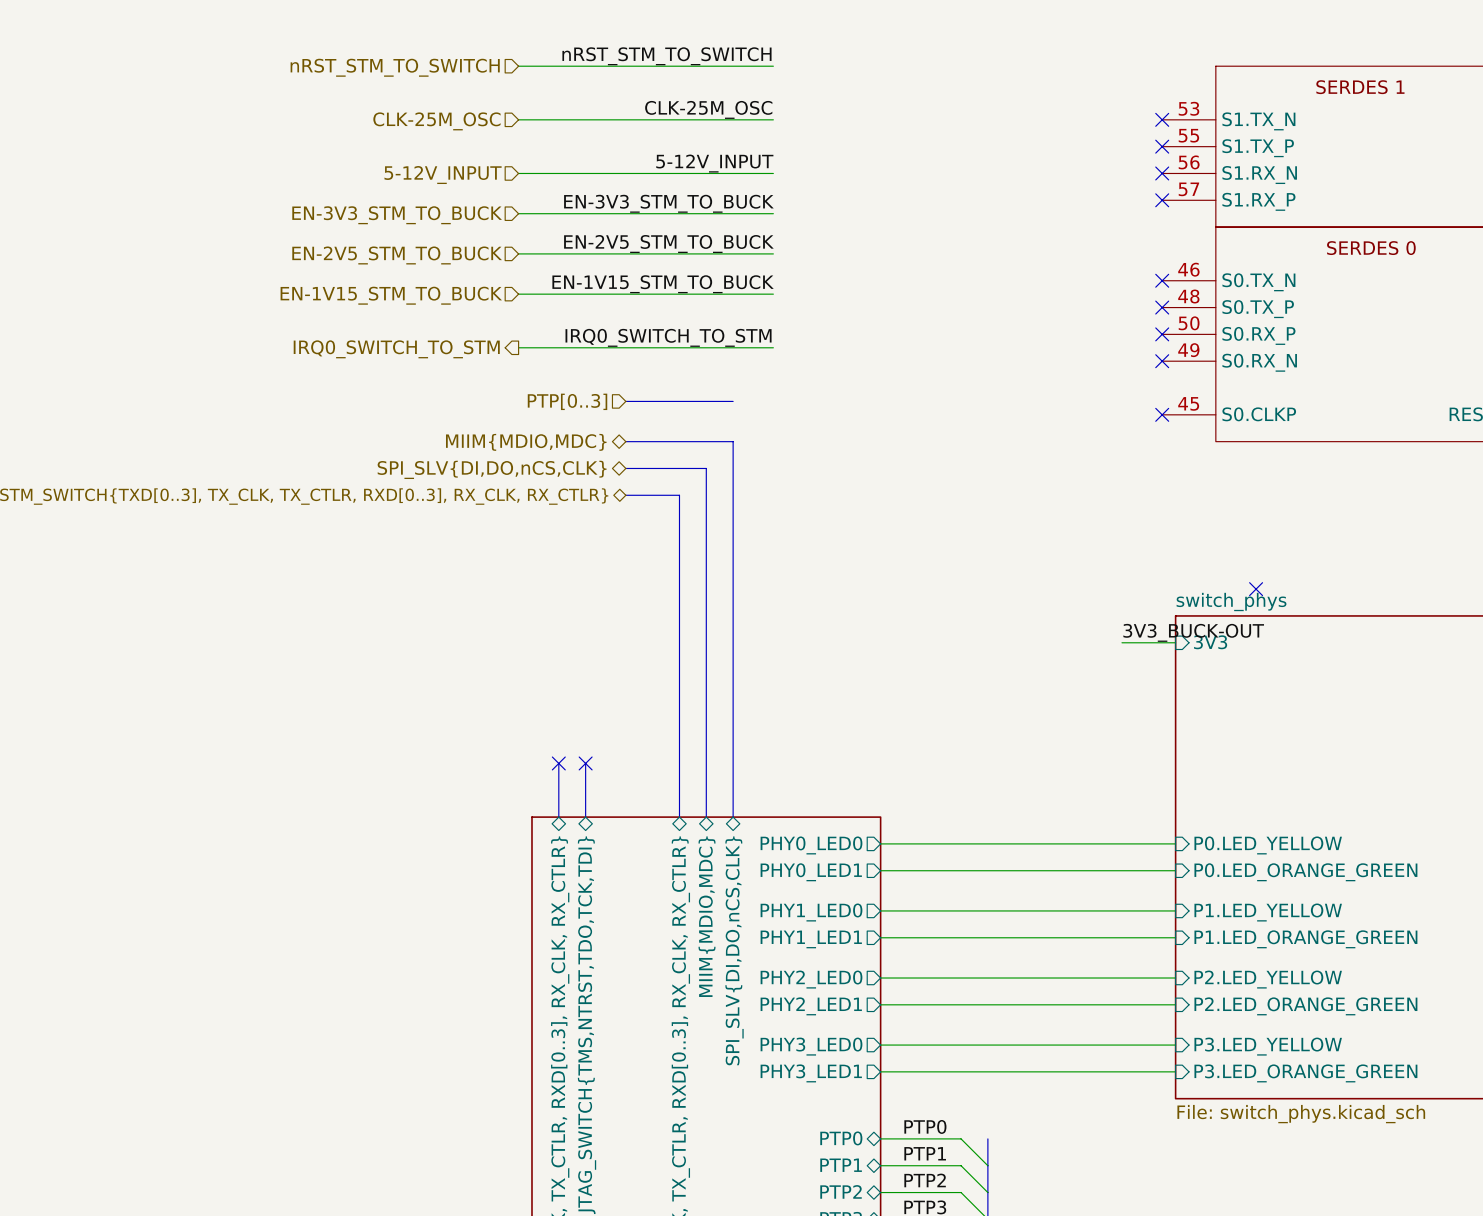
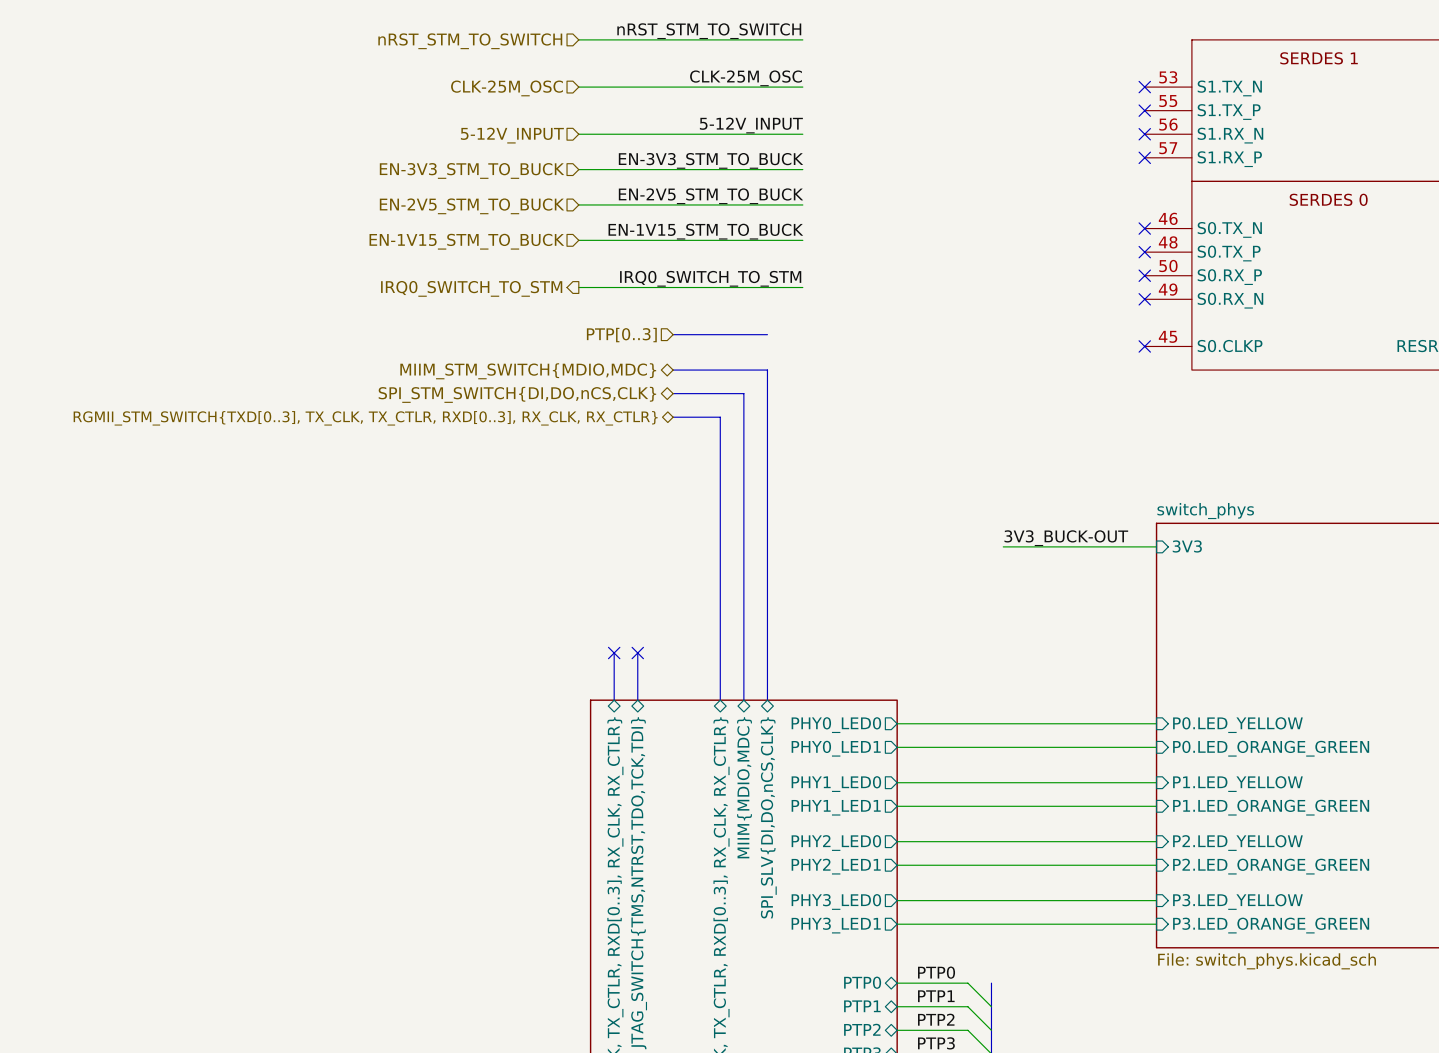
hierarchical label: MIIM{MDIO,MDC} (526, 442) -> MIIM_STM_SWITCH{MDIO,MDC} (528, 371)
hierarchical label: SPI_SLV{DI,DO,nCS,CLK} (492, 469) -> SPI_STM_SWITCH{DI,DO,nCS,CLK} (517, 394)
no-connect mark: (1256, 589) -> none
label position: 3V3_BUCK-OUT (1193, 632) -> 3V3_BUCK-OUT (1066, 538)
wire: none -> (1003, 546) (1109, 546)

